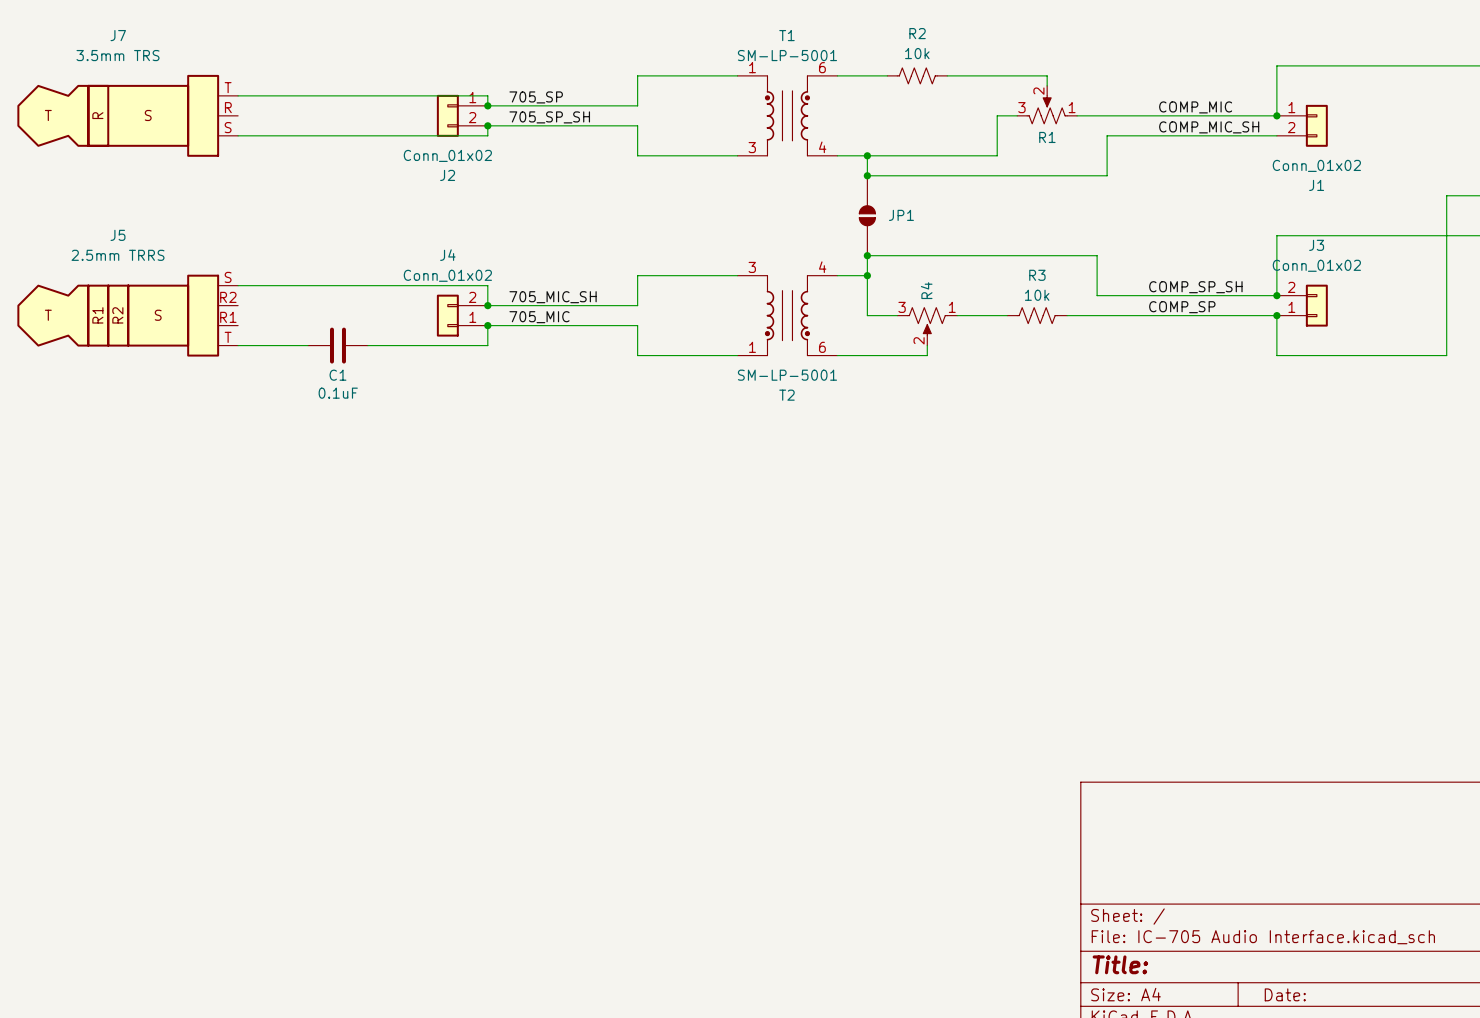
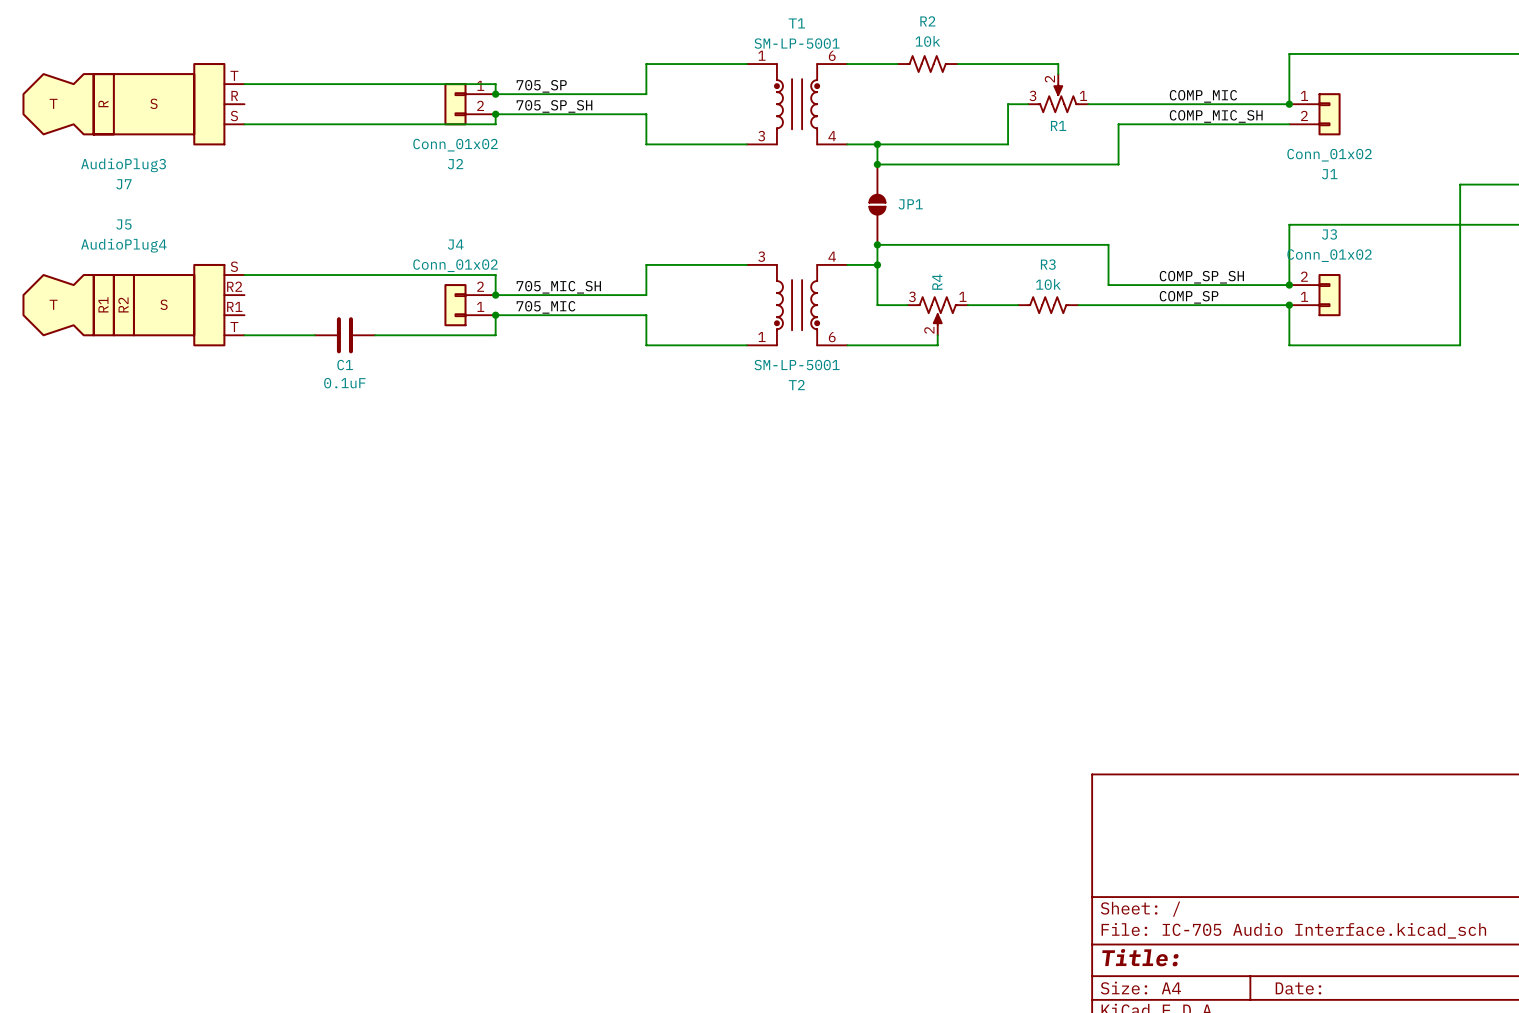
J7 name position: J7 (118, 35) -> J7 (123, 184)
J7 value: 3.5mm TRS (118, 55) -> AudioPlug3 (123, 165)
J5 value: 2.5mm TRRS (118, 255) -> AudioPlug4 (123, 245)

